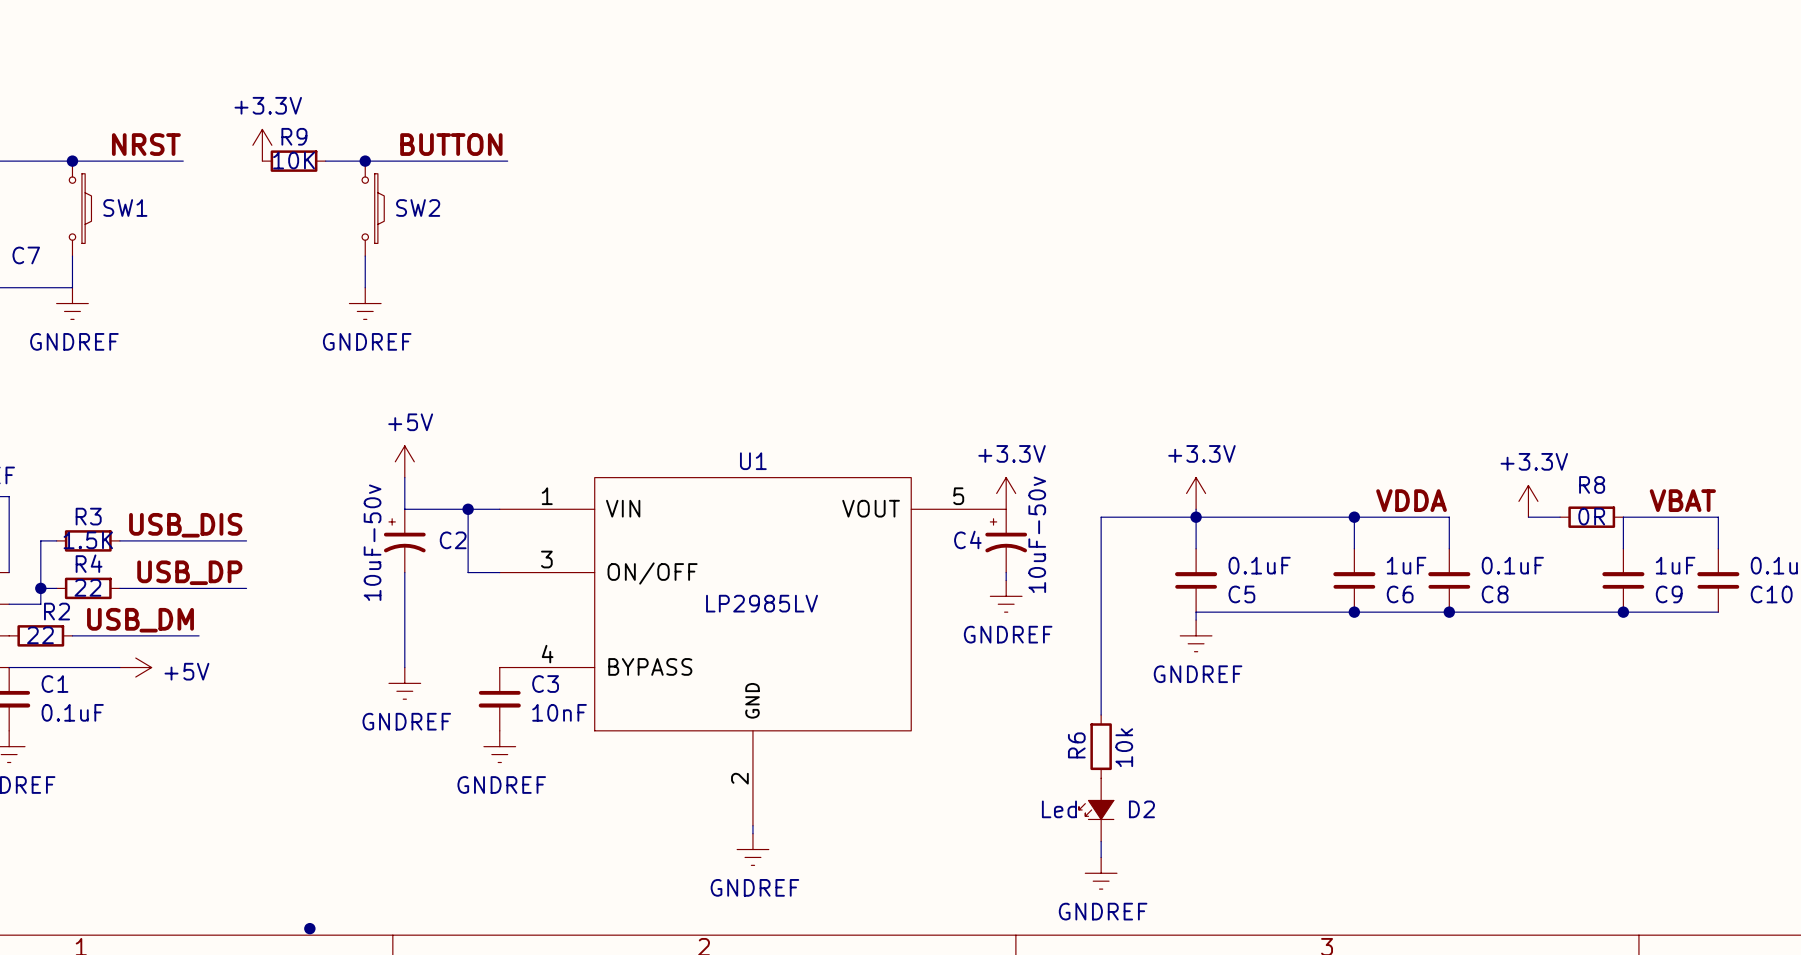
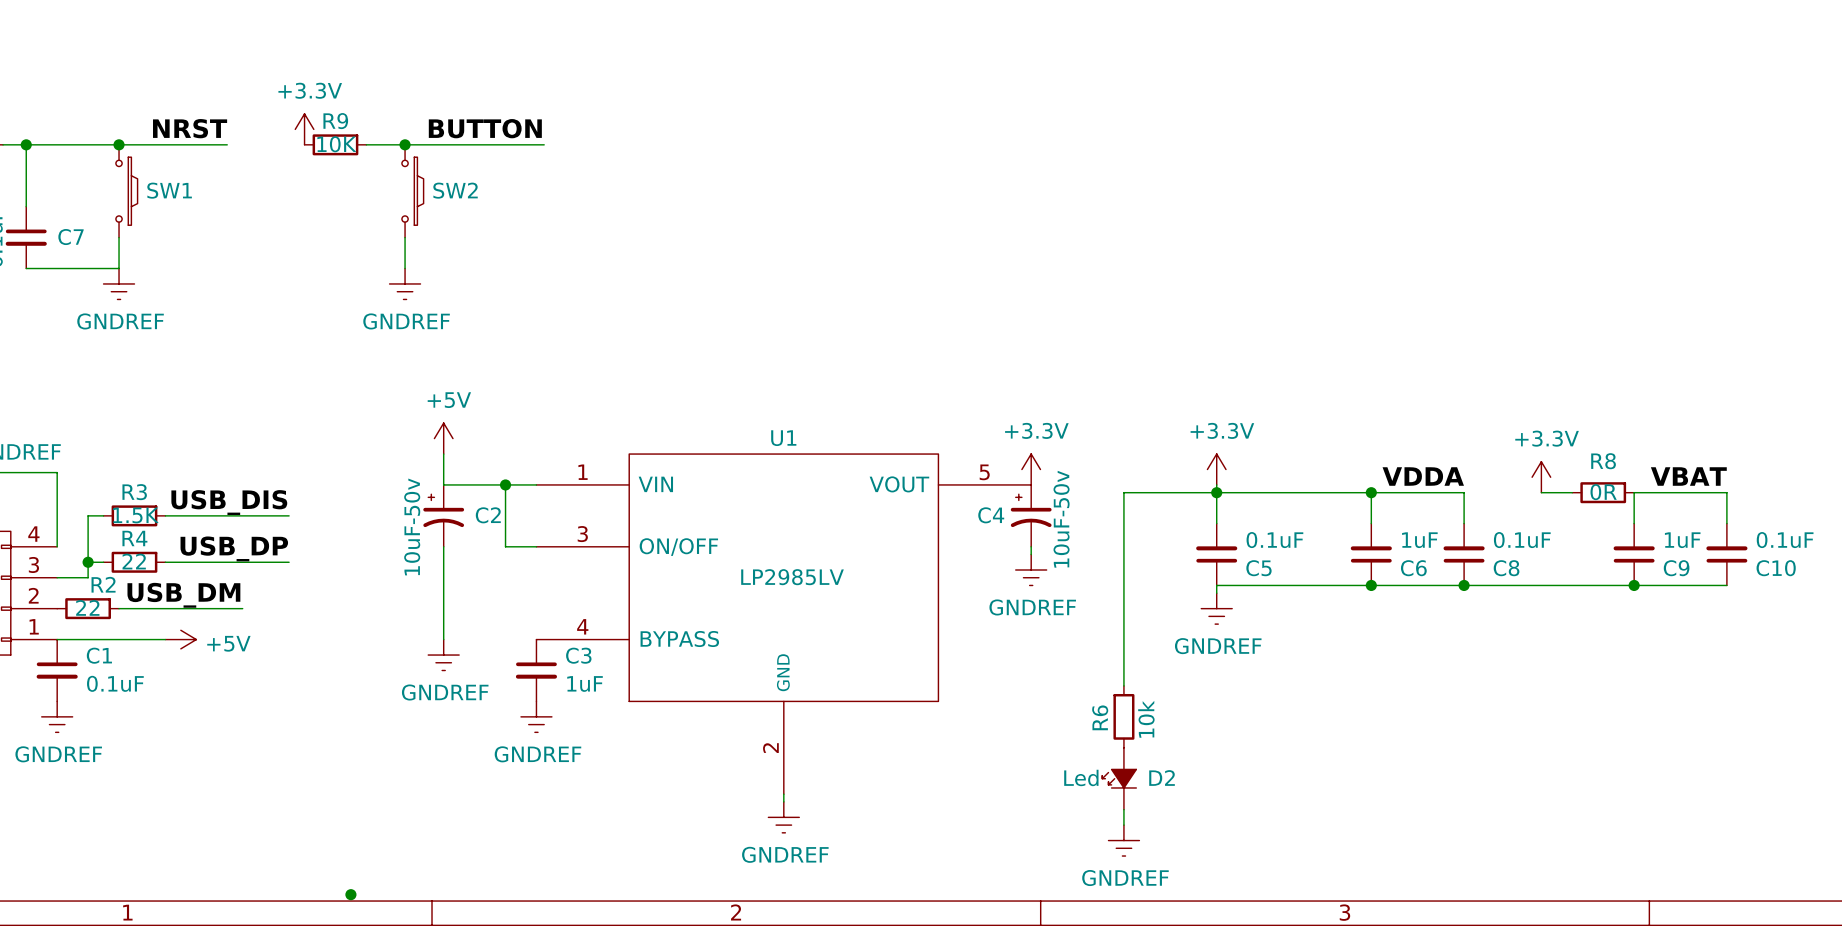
C3 value: 10nF (559, 712) -> 1uF (585, 683)

